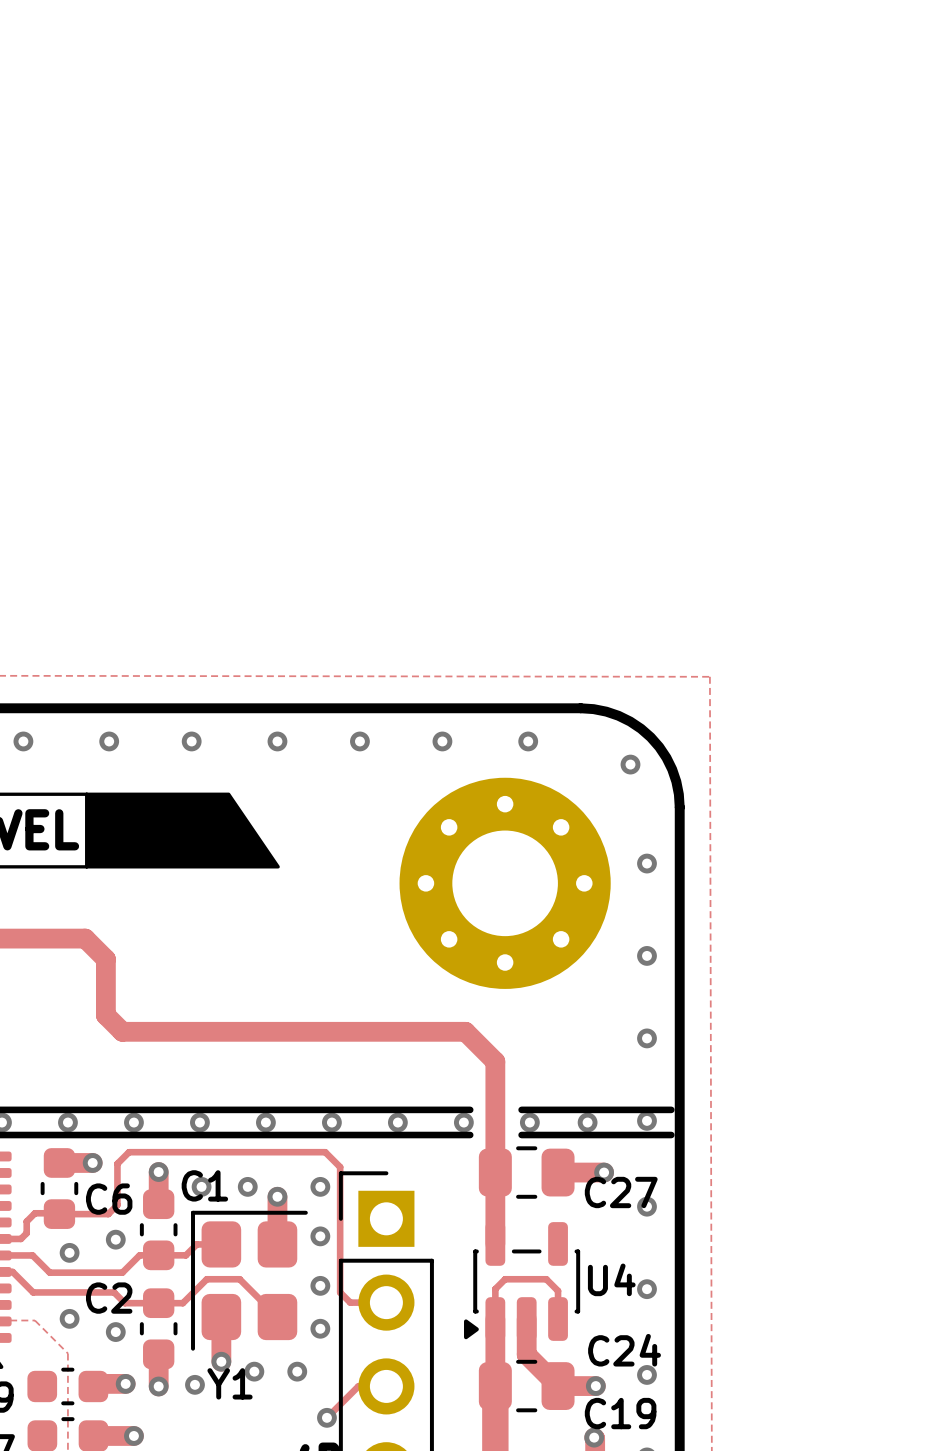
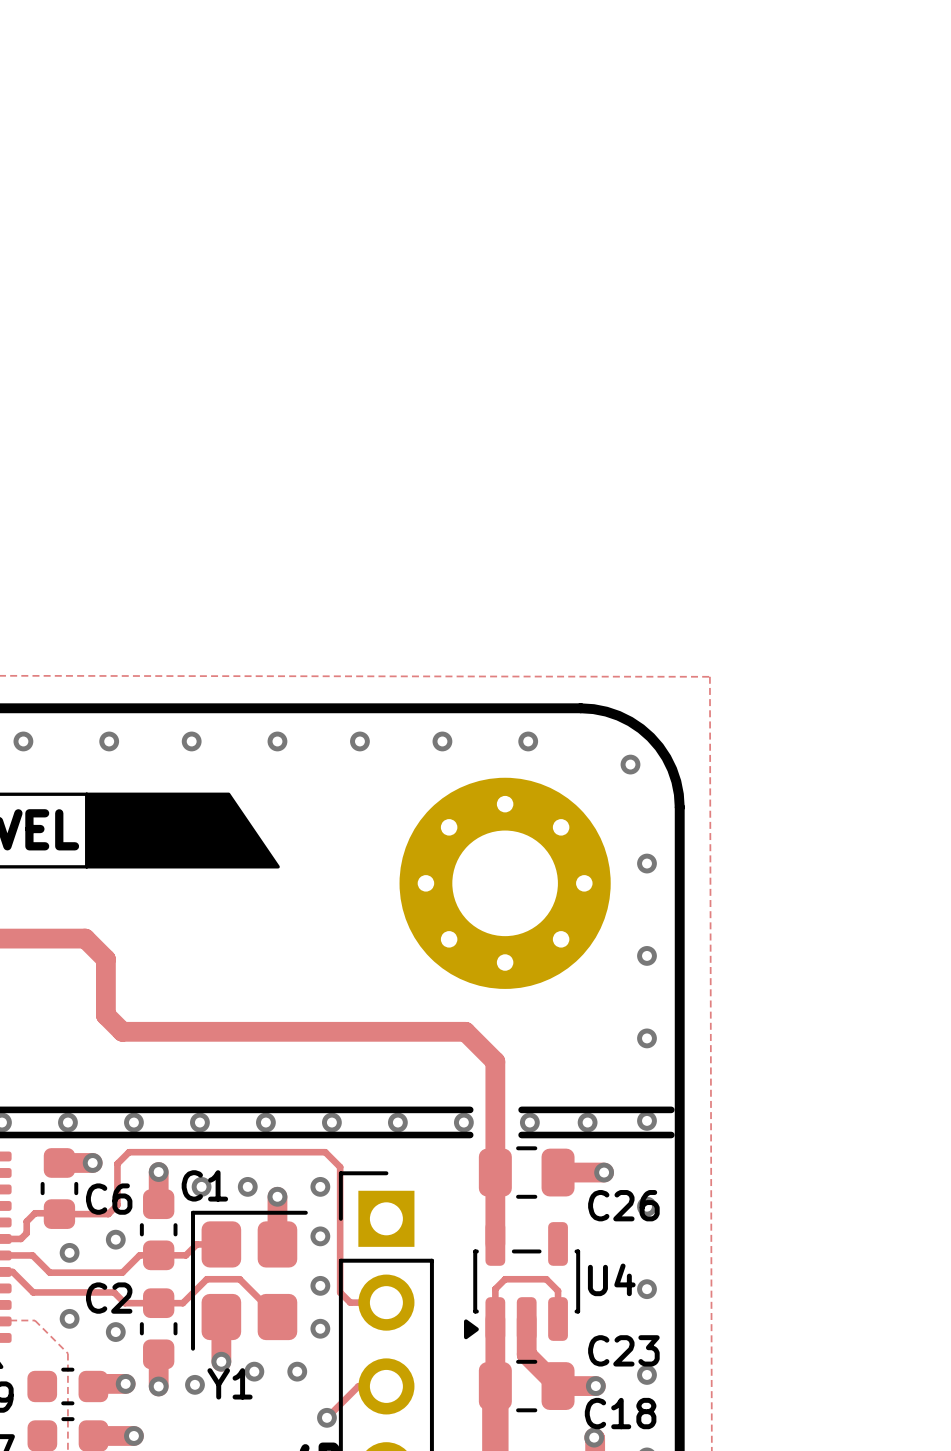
C27 name: C27 (621, 1192) -> C26 (623, 1205)
C24 name: C24 (624, 1350) -> C23 (623, 1350)
C19 name: C19 (620, 1413) -> C18 (620, 1413)

